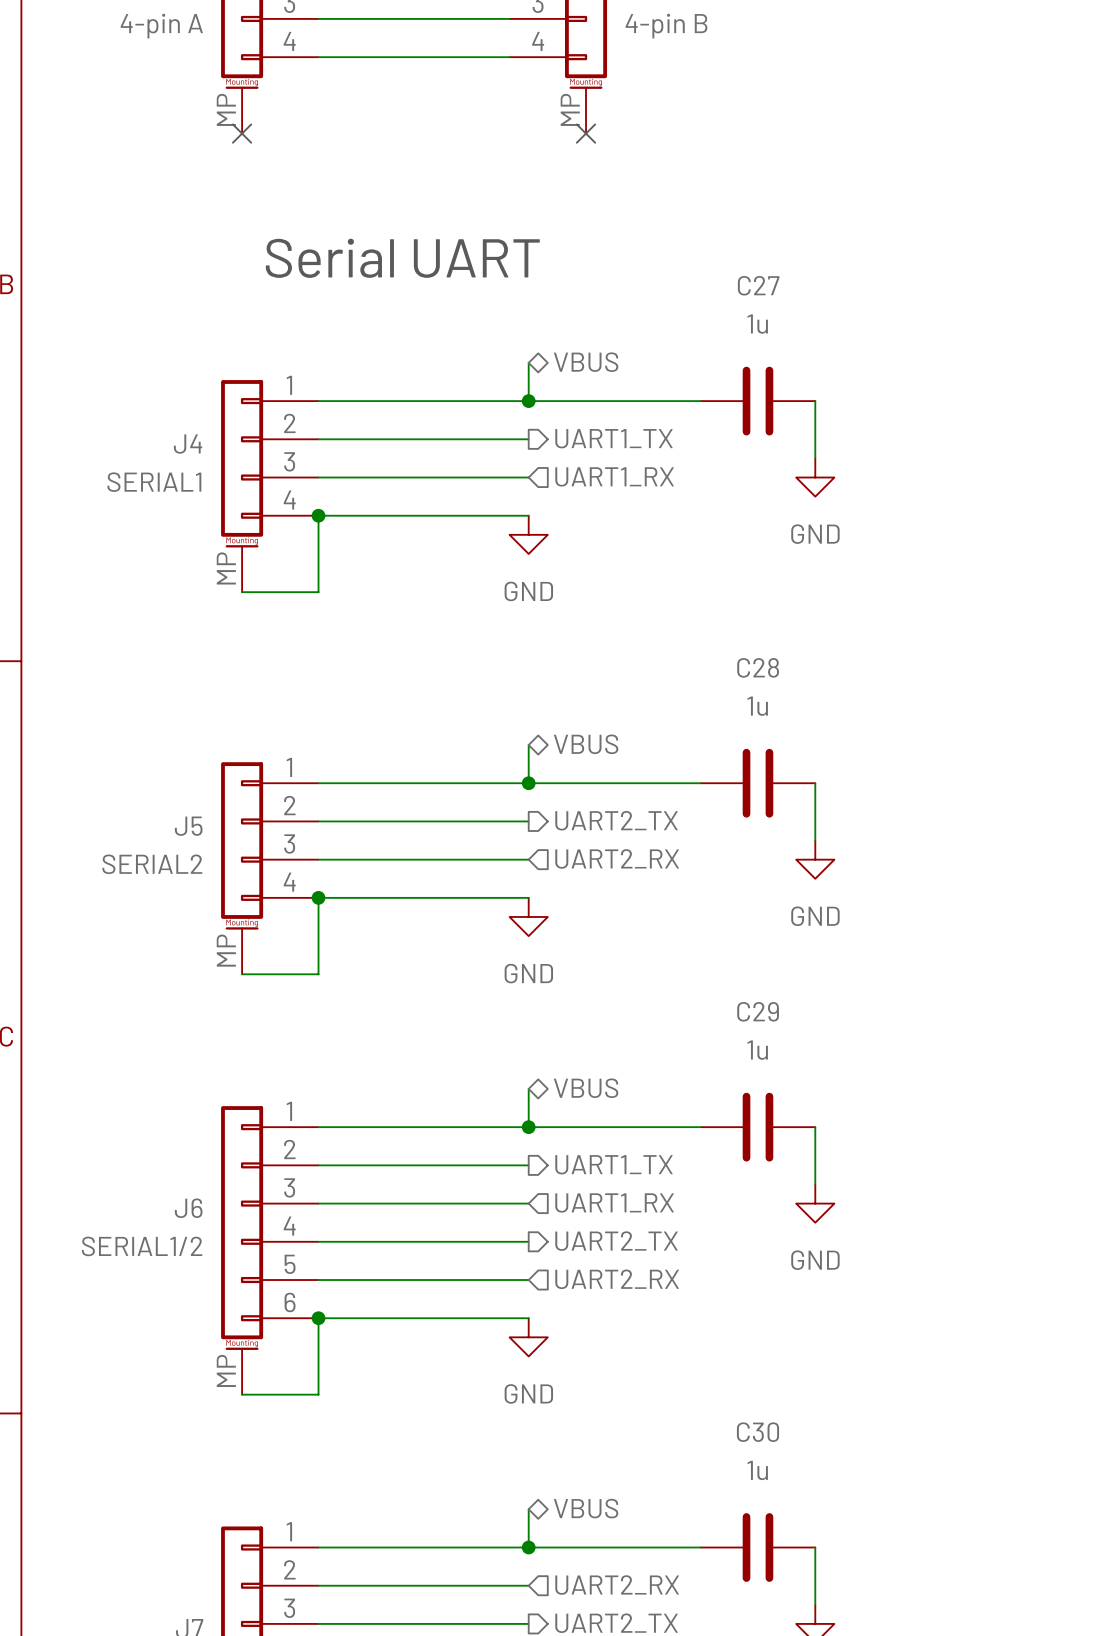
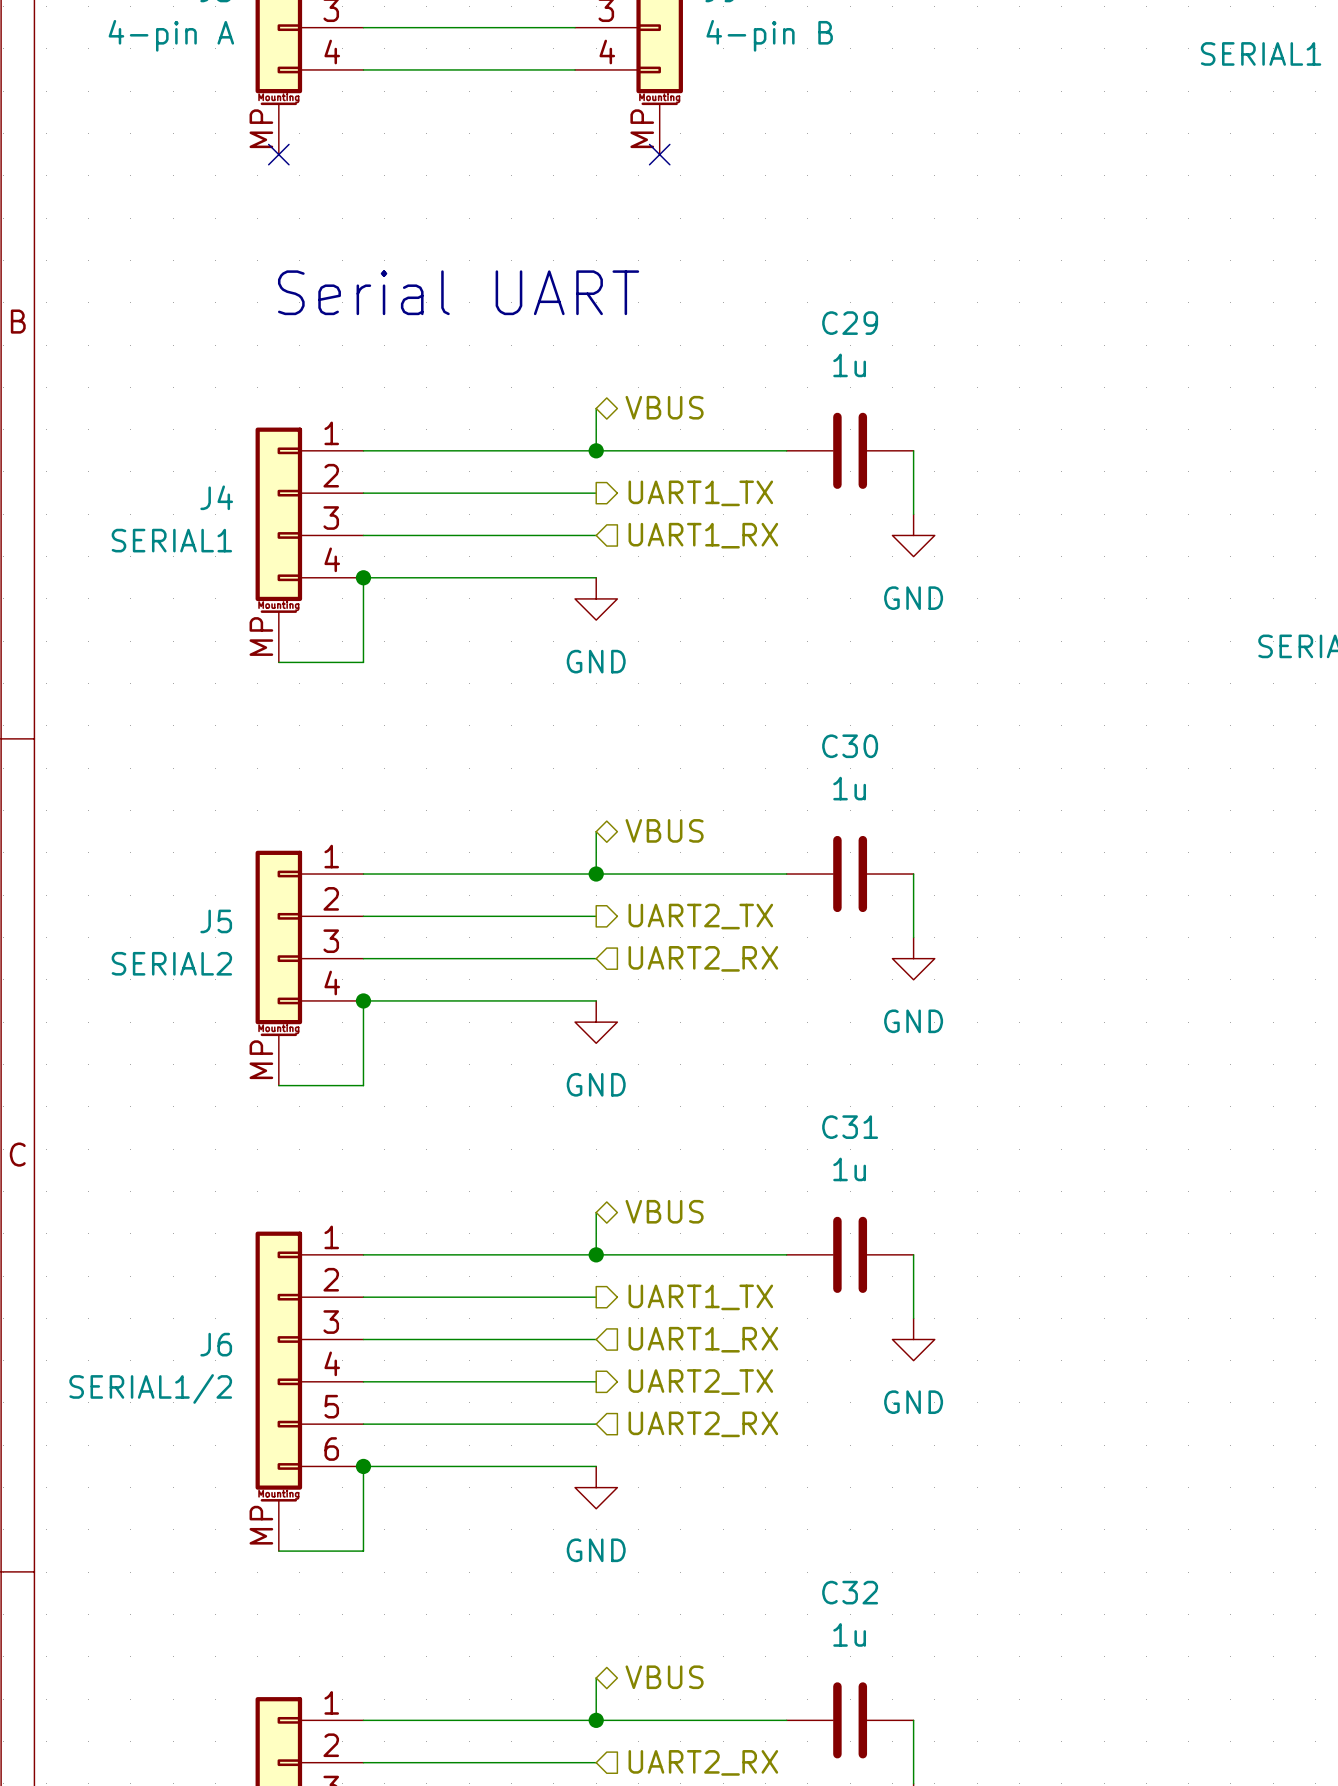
C27 name: C27 (758, 285) -> C29 (850, 323)
C28 name: C28 (758, 667) -> C30 (850, 746)
C29 name: C29 (758, 1011) -> C31 (850, 1127)
C30 name: C30 (757, 1432) -> C32 (850, 1592)

